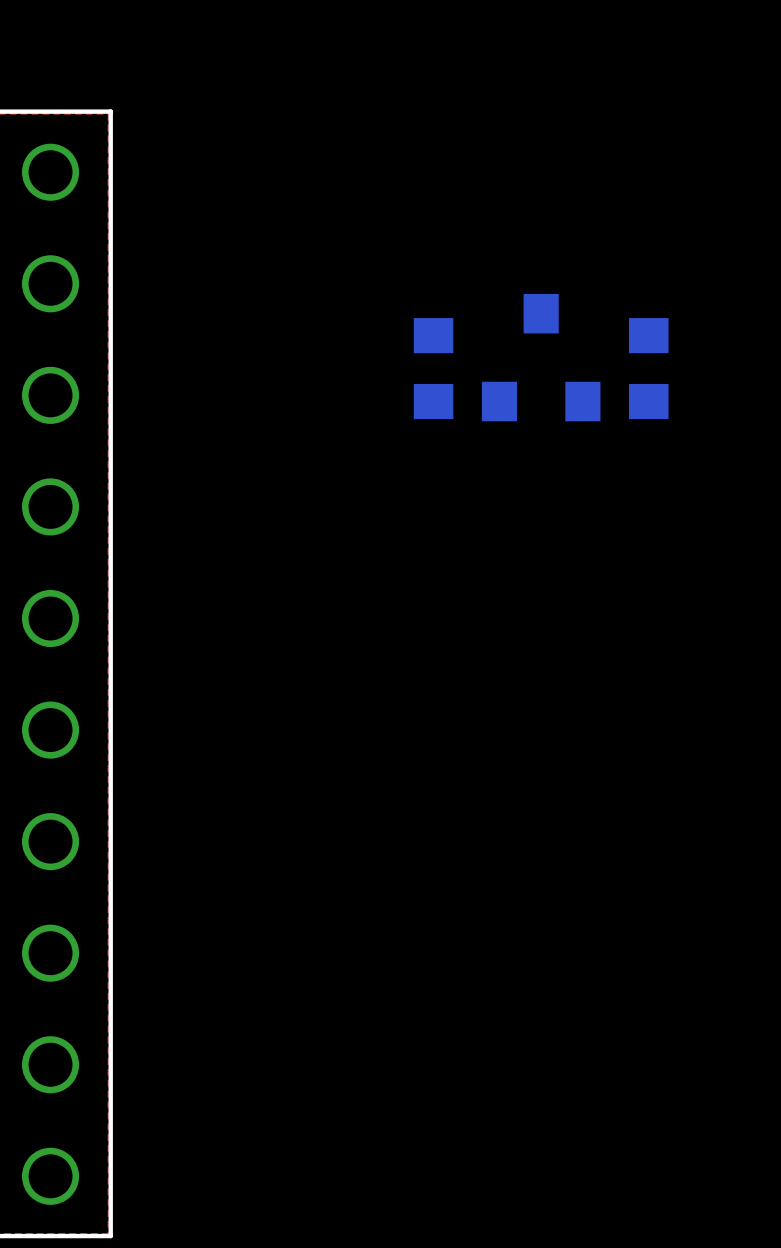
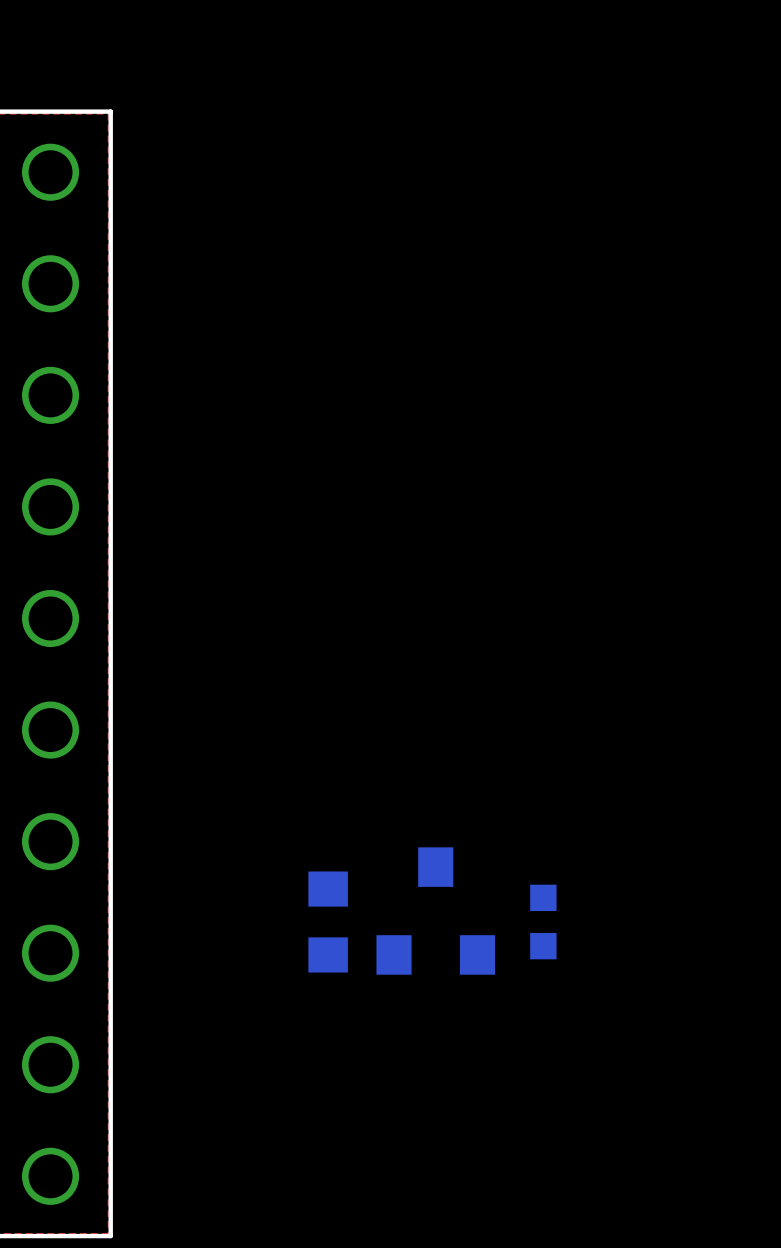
part position: (541, 357) -> (435, 911)
part: (433, 368) -> none
part: (648, 368) -> none
part: none -> (328, 922)
part: none -> (543, 922)

